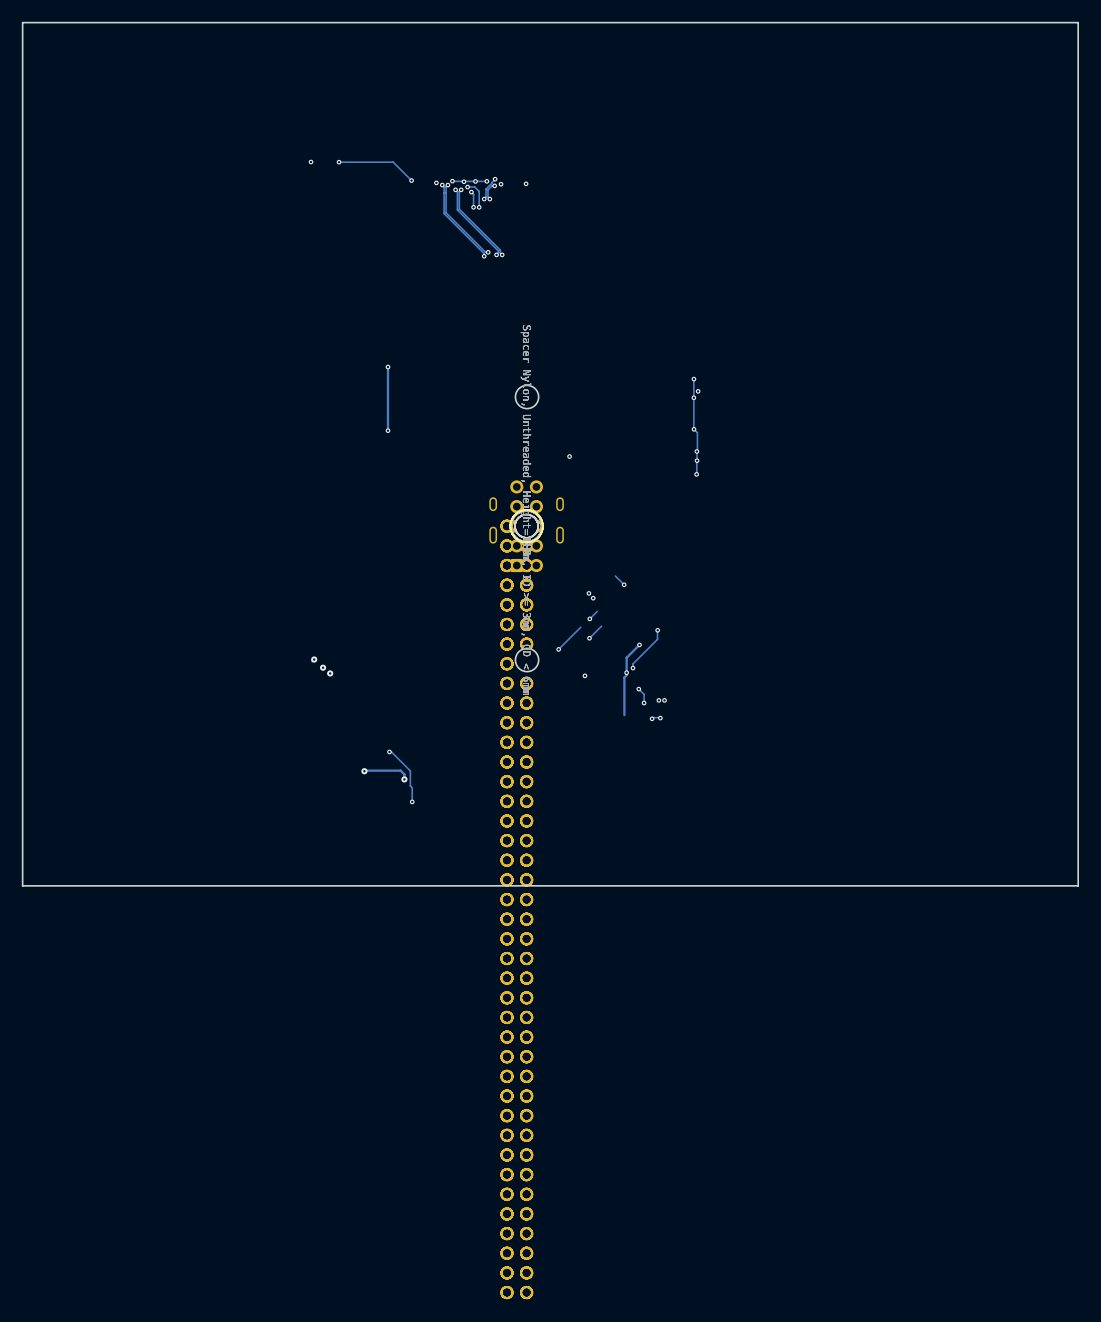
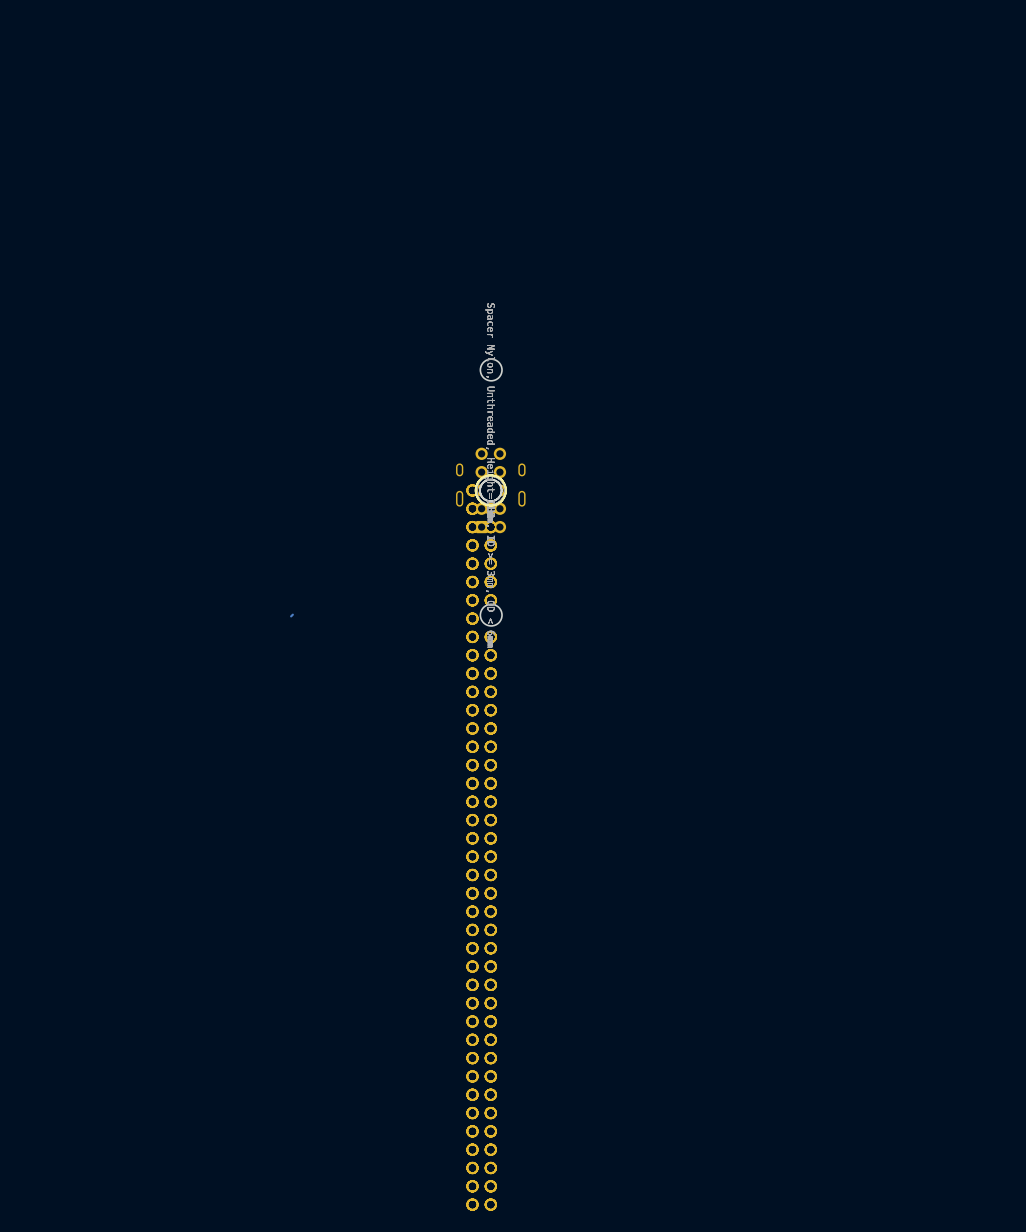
board edge: (1078, 22) (22, 22) (22, 885) (1078, 885) (1078, 22) -> none
via: (311, 162) -> none
track: (339, 162) (393, 162) (411, 180) -> none
via: (339, 162) -> none
track: (495, 179) (486, 189) (484, 199) -> none
via: (495, 179) -> none
via: (411, 180) -> none
track: (452, 181) (486, 181) -> none
via: (452, 181) -> none
via: (463, 181) -> none
via: (475, 181) -> none
via: (486, 181) -> none
via: (436, 182) -> none
via: (526, 183) -> none
via: (501, 184) -> none
track: (442, 185) (444, 186) (444, 213) (484, 253) (484, 256) -> none
via: (442, 185) -> none
track: (447, 185) (446, 186) (446, 212) (485, 252) (488, 252) -> none
via: (447, 185) -> none
track: (494, 185) (488, 189) (489, 199) -> none
via: (494, 185) -> none
track: (467, 187) (474, 187) (479, 191) (479, 207) -> none
via: (467, 187) -> none
track: (455, 189) (457, 191) (457, 209) (498, 250) (496, 254) -> none
via: (455, 189) -> none
track: (461, 189) (459, 191) (459, 209) (500, 250) (502, 254) -> none
via: (461, 189) -> none
track: (471, 192) (473, 194) (473, 207) -> none
via: (471, 192) -> none
via: (484, 199) -> none
via: (489, 199) -> none
via: (473, 207) -> none
via: (479, 207) -> none
via: (488, 252) -> none
via: (496, 254) -> none
via: (502, 254) -> none
via: (484, 256) -> none
track: (387, 367) (387, 430) -> none
via: (387, 367) -> none
track: (693, 379) (693, 429) (697, 432) (696, 474) -> none
via: (693, 379) -> none
via: (698, 391) -> none
via: (693, 397) -> none
via: (694, 429) -> none
via: (387, 430) -> none
via: (696, 451) -> none
via: (569, 456) -> none
via: (697, 460) -> none
via: (696, 474) -> none
track: (615, 575) (624, 584) -> none
via: (624, 584) -> none
via: (588, 593) -> none
via: (593, 598) -> none
track: (597, 611) (589, 618) -> none
via: (589, 618) -> none
track: (601, 626) (589, 638) -> none
track: (580, 627) (558, 649) -> none
track: (657, 630) (657, 639) (632, 663) (632, 668) -> none
via: (657, 630) -> none
via: (589, 638) -> none
track: (639, 644) (626, 657) (624, 715) -> none
via: (639, 644) -> none
via: (558, 649) -> none
via: (314, 659) -> none
via: (323, 667) -> none
via: (632, 668) -> none
via: (626, 672) -> none
via: (330, 673) -> none
via: (584, 675) -> none
track: (638, 689) (644, 694) (644, 703) -> none
via: (638, 689) -> none
via: (658, 700) -> none
via: (664, 700) -> none
via: (644, 703) -> none
via: (652, 718) -> none
track: (660, 718) (652, 718) -> none
via: (660, 718) -> none
track: (389, 751) (410, 770) (412, 801) -> none
via: (389, 751) -> none
track: (364, 771) (400, 770) (404, 774) (404, 779) -> none
via: (364, 771) -> none
via: (404, 779) -> none
via: (412, 801) -> none

